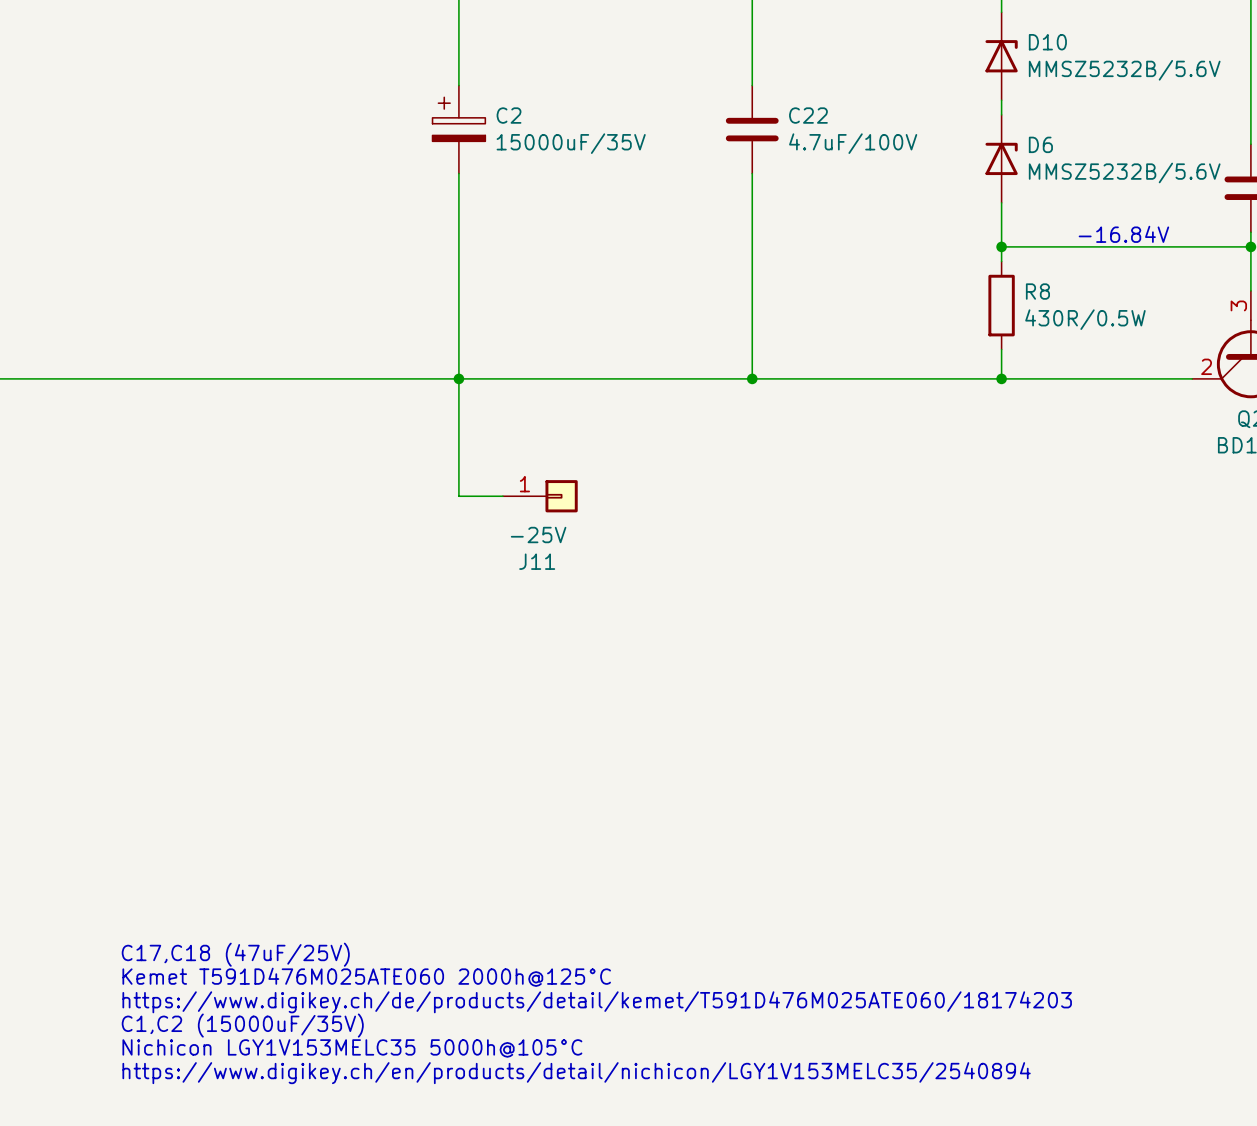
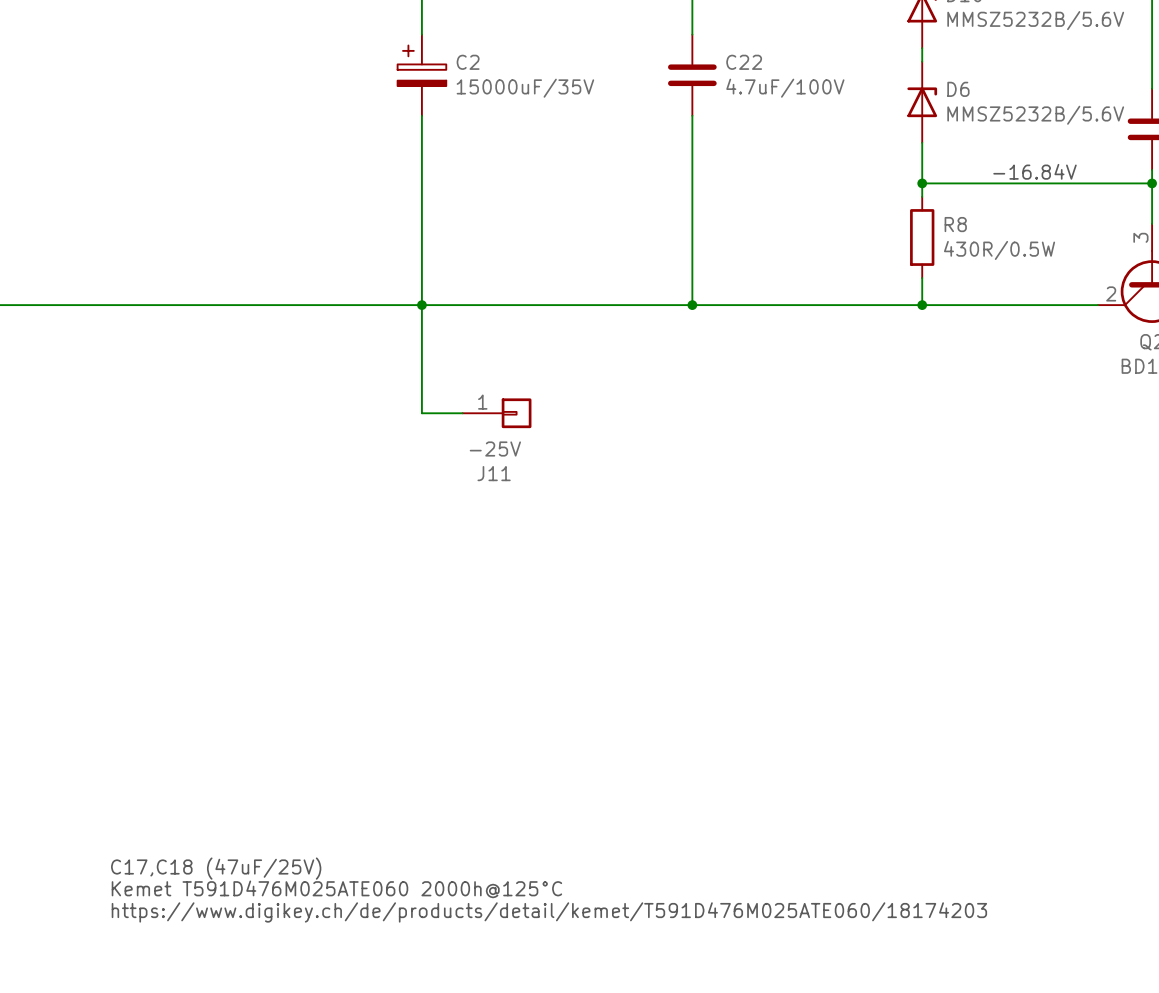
text position: C17,C18 (47uF/25V) (235, 954) -> C17,C18 (47uF/25V) (216, 868)
text position: Kemet T591D476M025ATE060 2000h@125°C (366, 977) -> Kemet T591D476M025ATE060 2000h@125°C (336, 889)
text position: https://www.digikey.ch/de/products/detail/kemet/T591D476M025ATE060/18174203 (597, 1002) -> https://www.digikey.ch/de/products/detail/kemet/T591D476M025ATE060/18174203 (549, 912)
text: C1,C2 (15000uF/35V) (242, 1025) -> none
text: Nichicon LGY1V153MELC35 5000h@105°C (352, 1048) -> none
text: https://www.digikey.ch/en/products/detail/nichicon/LGY1V153MELC35/2540894 (576, 1073) -> none

